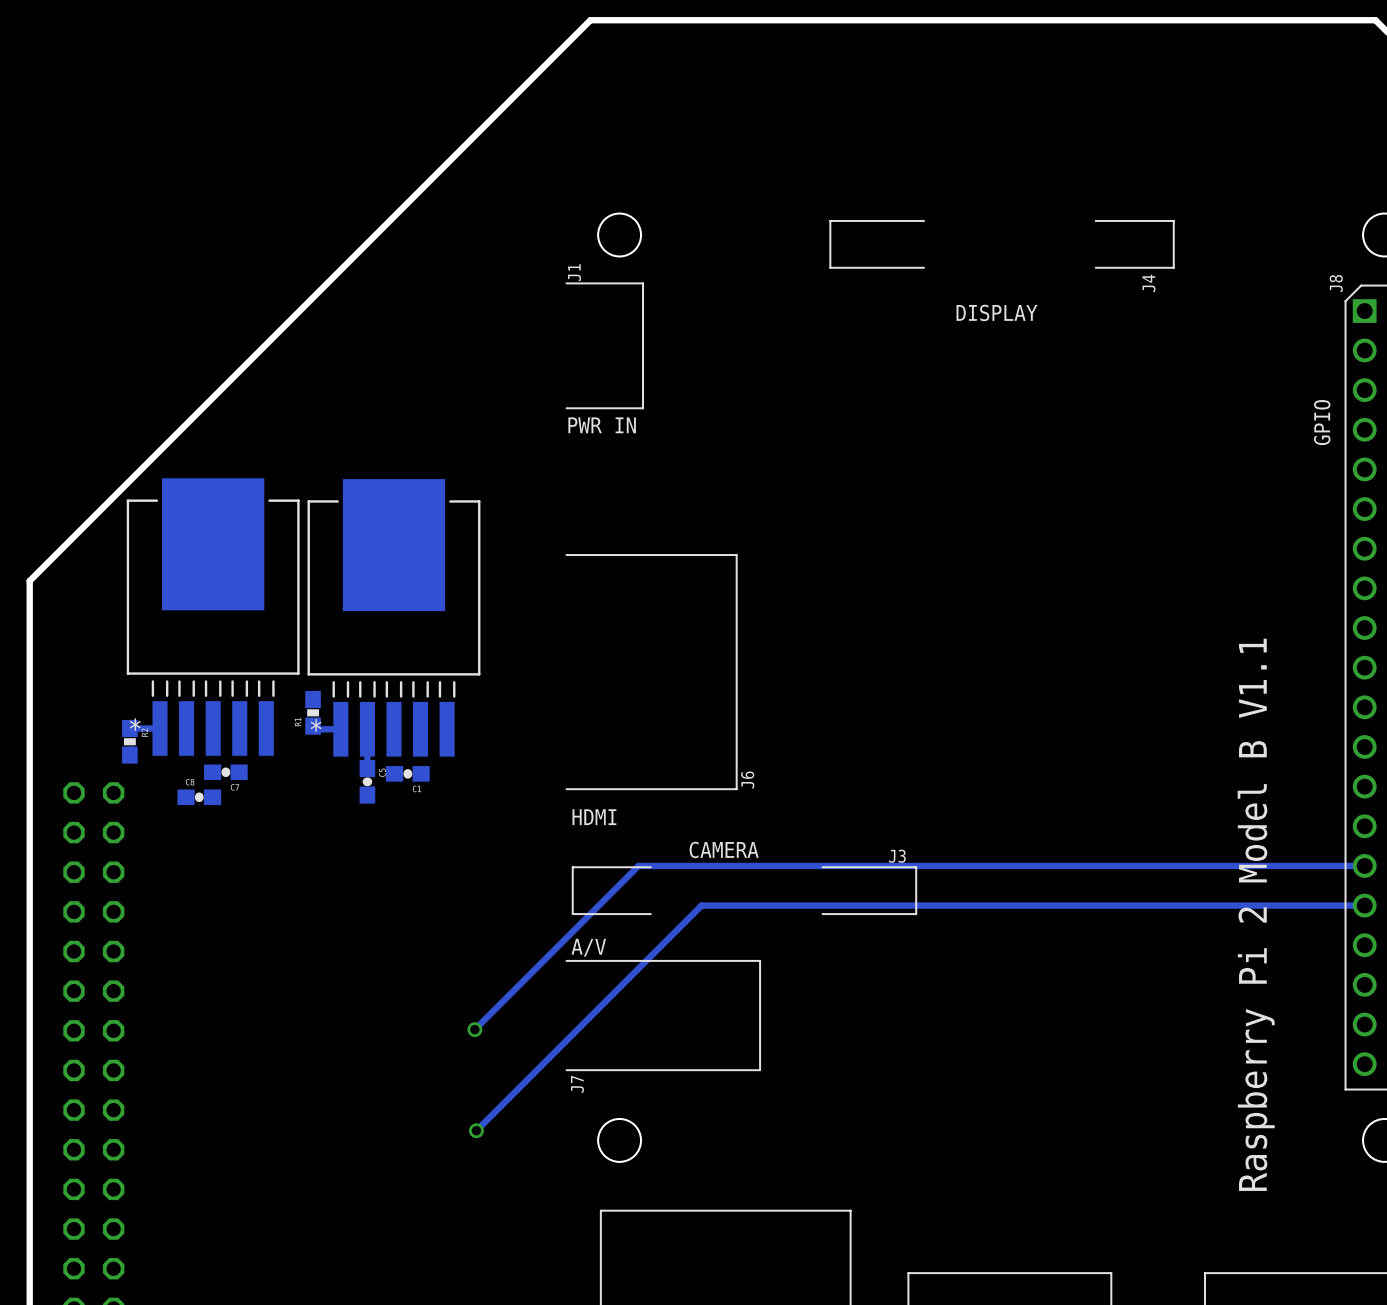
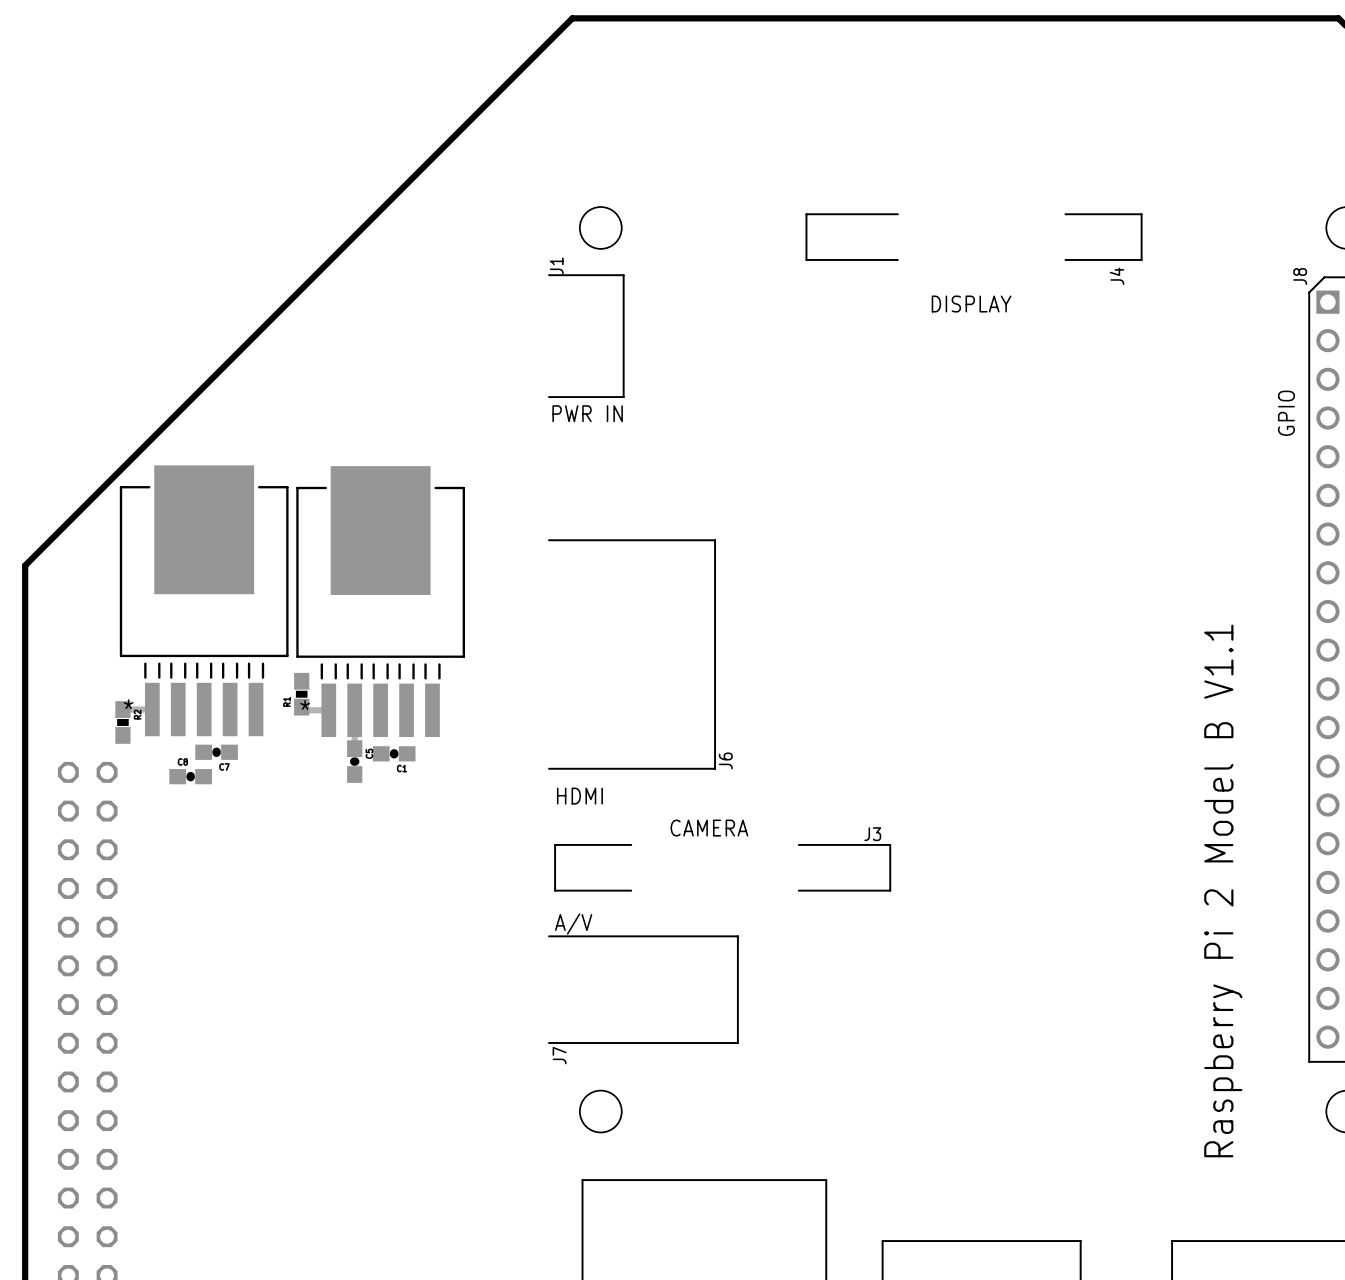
track: (1364, 865) (638, 865) (474, 1029) -> none
track: (1364, 905) (701, 905) (476, 1130) -> none
via: (474, 1029) -> none
via: (476, 1130) -> none

